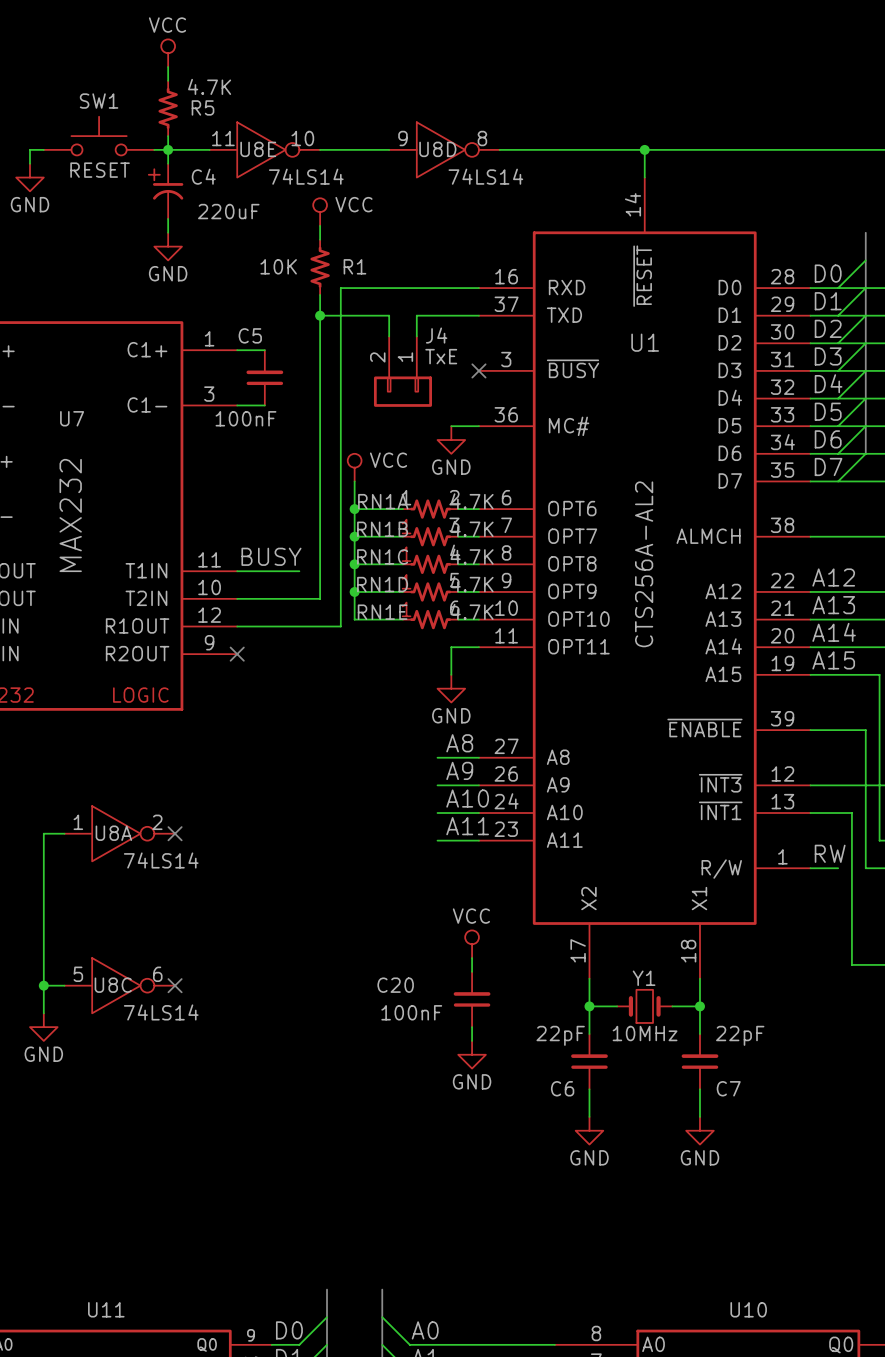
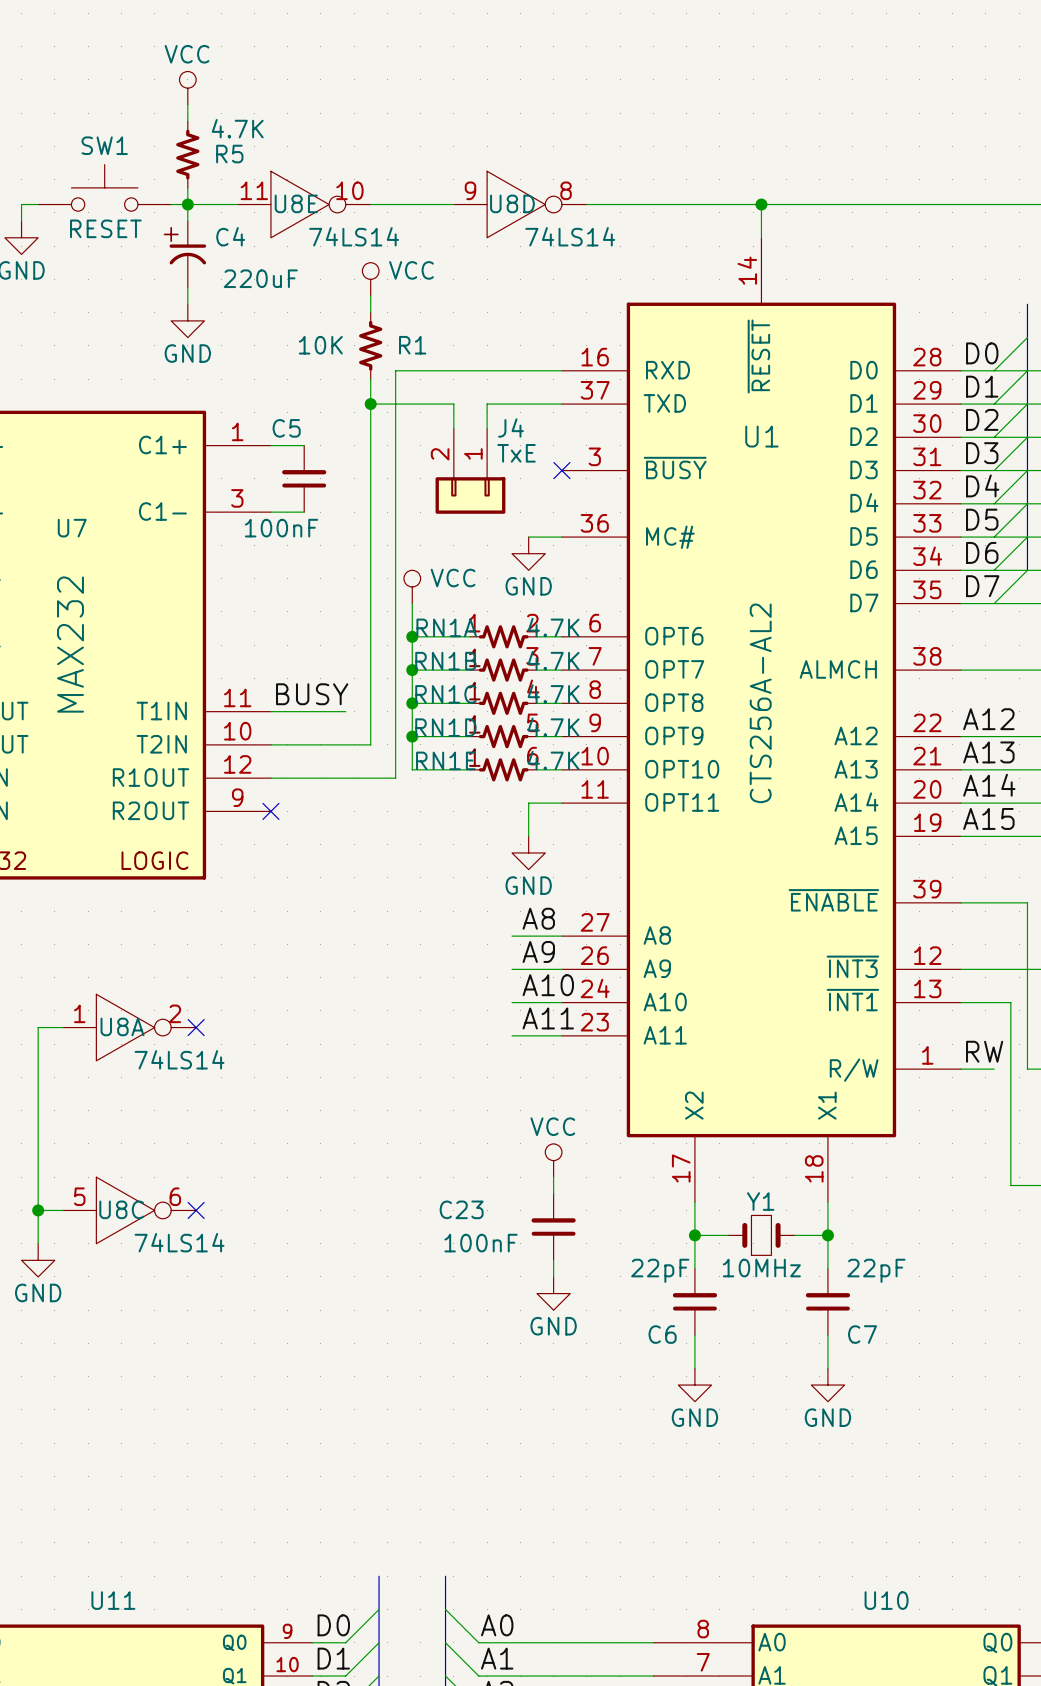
C20 name: C20 (395, 985) -> C23 (461, 1209)

